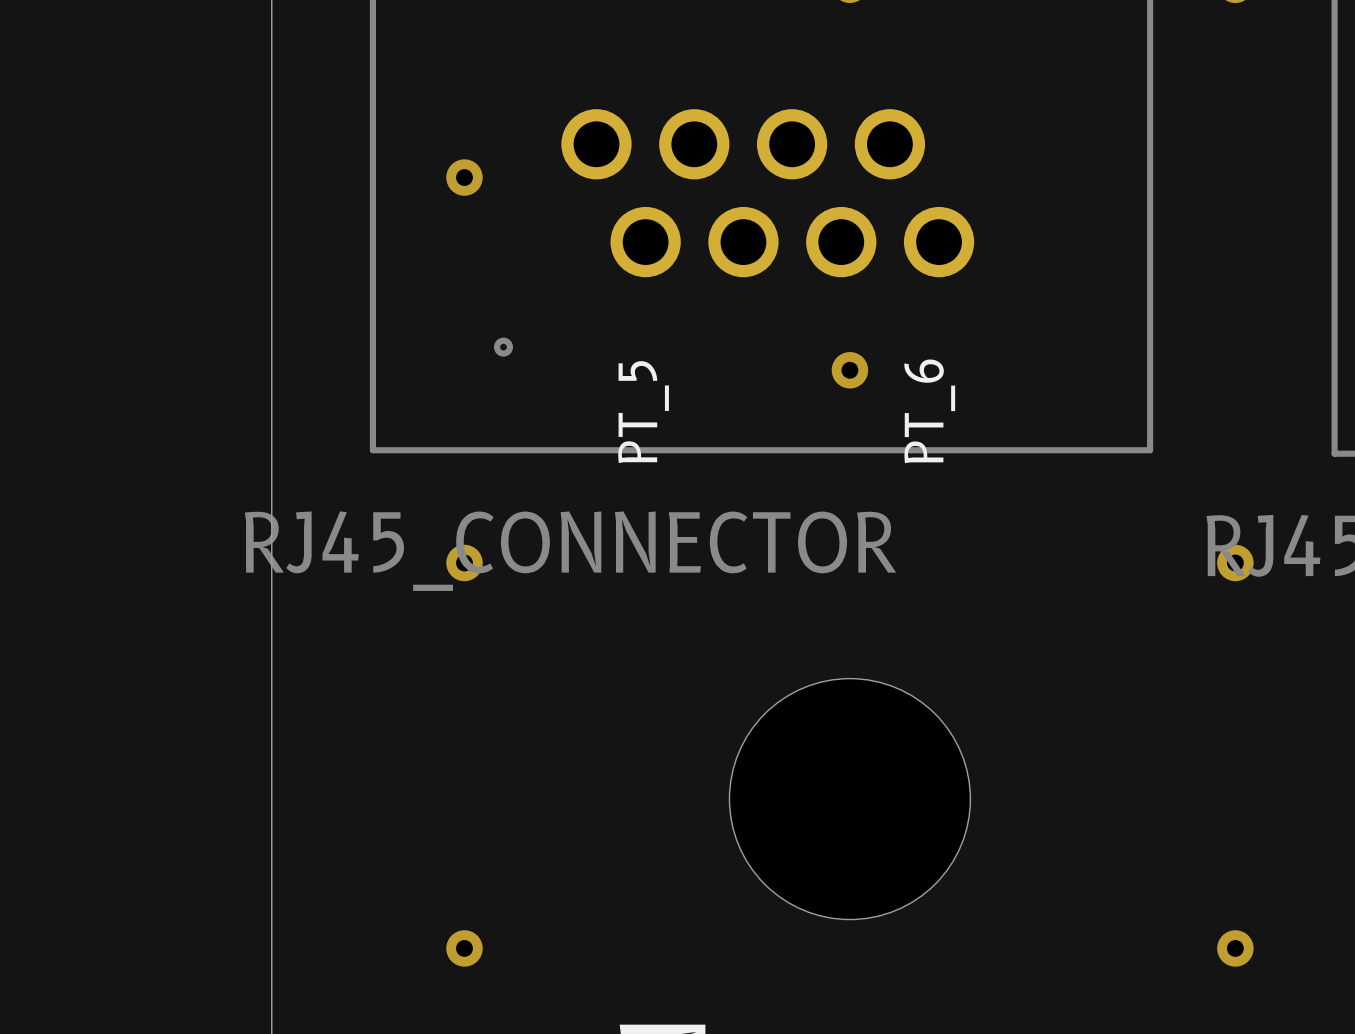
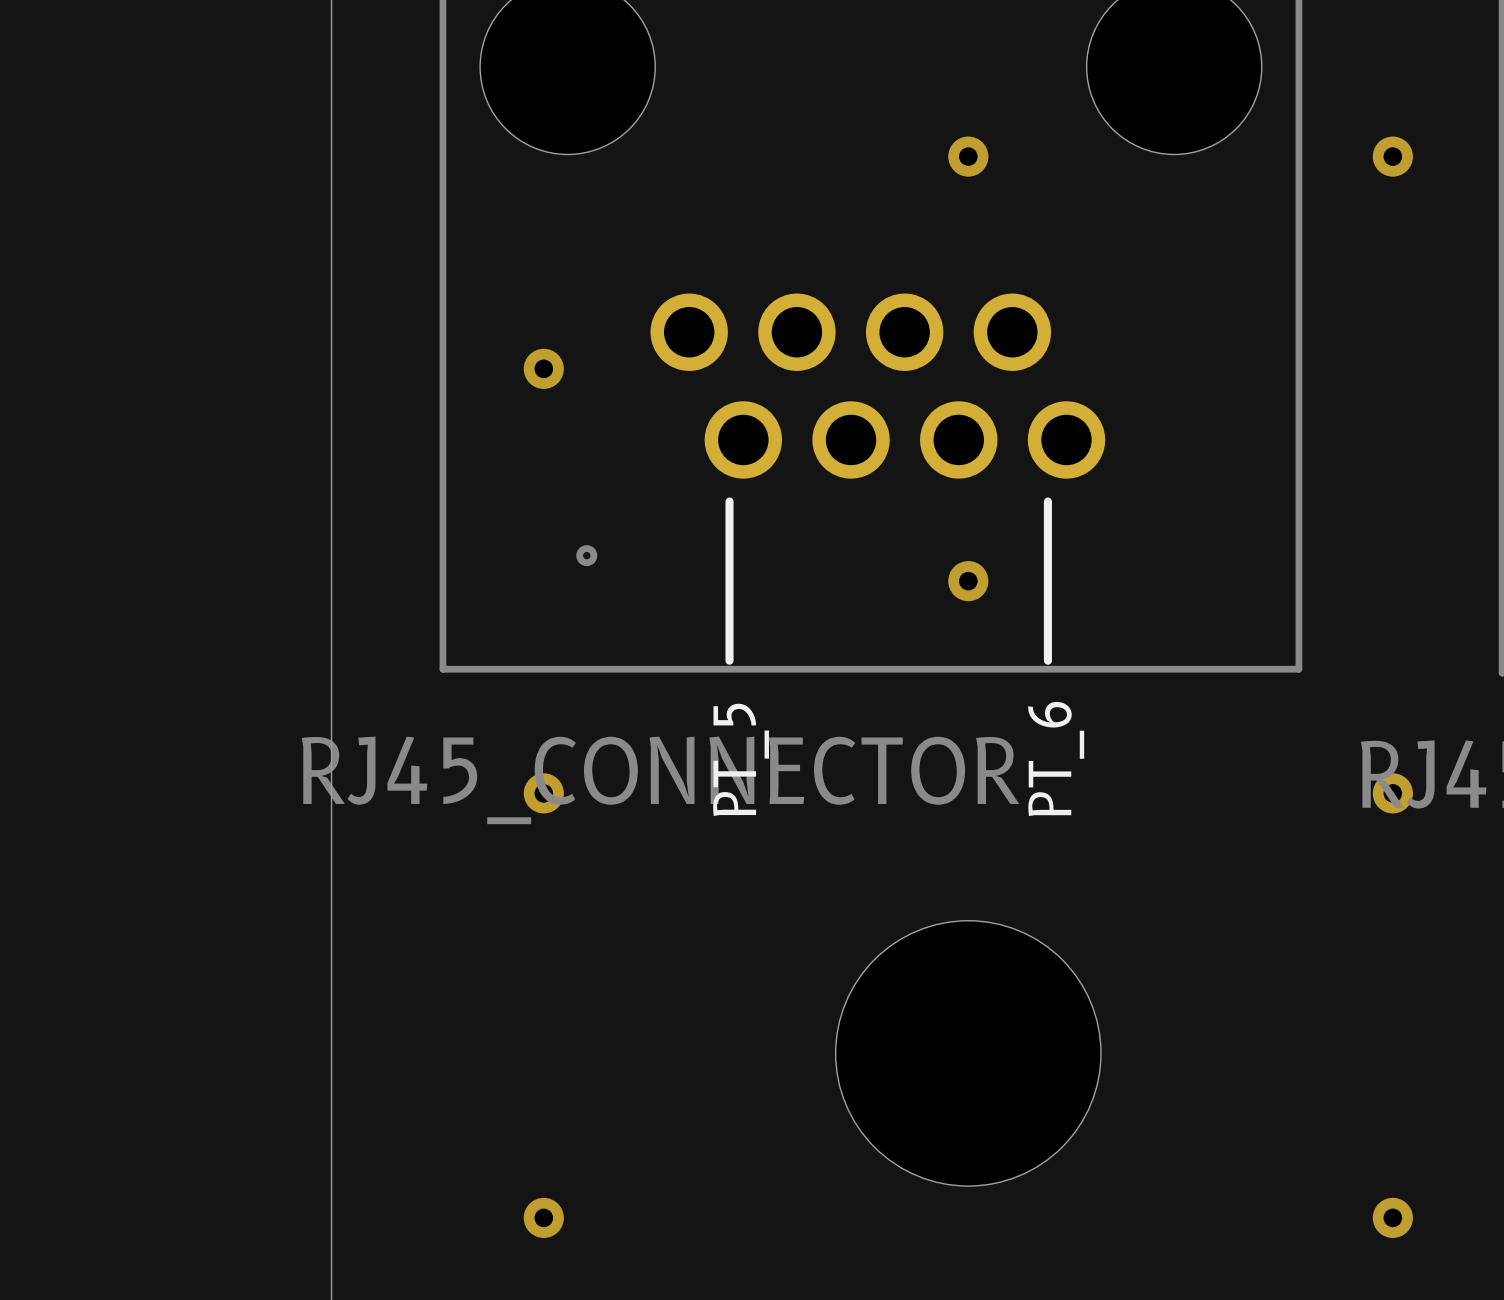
line: none -> (729, 501) (729, 660)
line: none -> (1047, 501) (1047, 660)
text position: PT_6 (929, 411) -> PT_6 (1056, 759)
text position: PT_5 (643, 412) -> PT_5 (741, 759)

